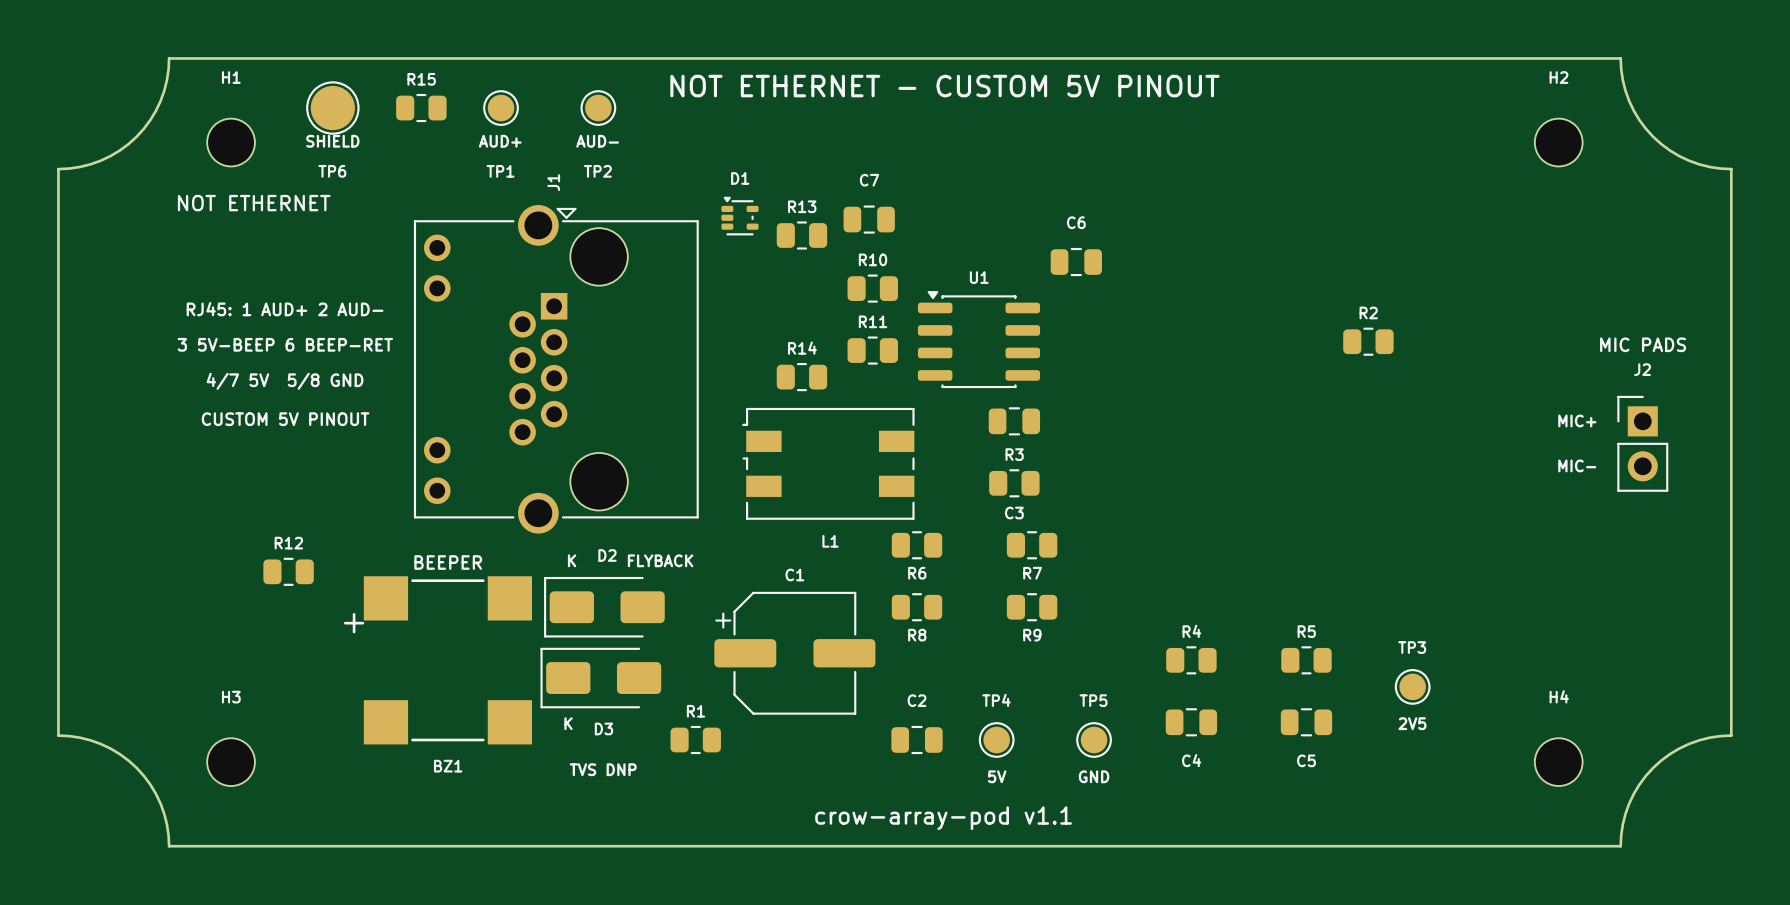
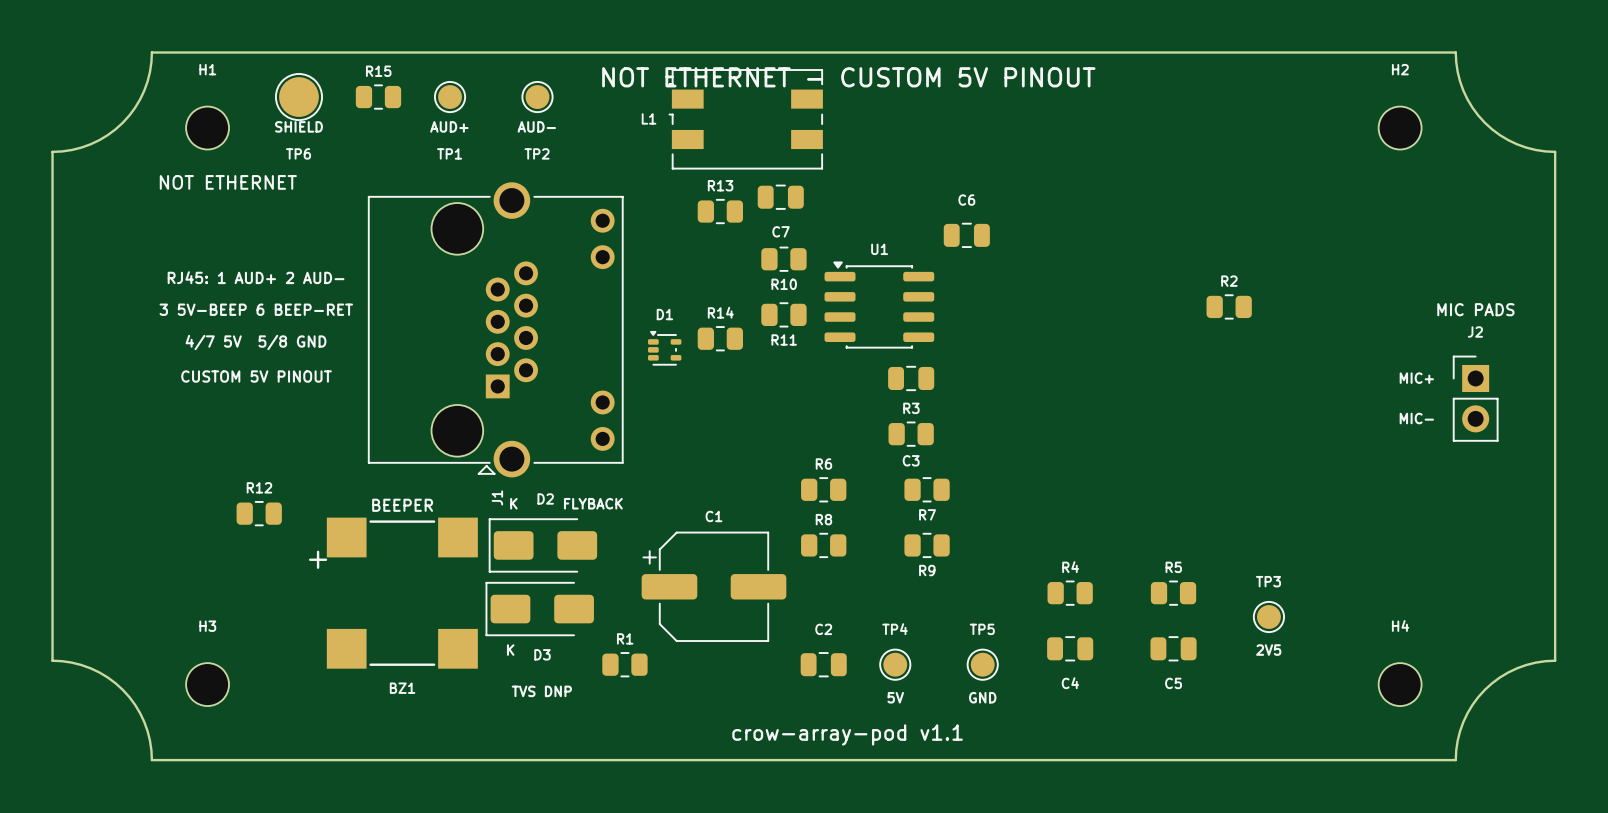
C7 name position: C7 (869, 180) -> C7 (781, 231)
D1 position: (739, 216) -> (664, 348)
R10 name position: R10 (873, 259) -> R10 (784, 284)
R11 name position: R11 (873, 321) -> R11 (784, 339)
J1 rotation: 0° (556, 369) -> 180° (495, 329)
L1 position: (828, 463) -> (745, 119)
L1 name position: L1 (830, 541) -> L1 (649, 118)
R6 name position: R6 (917, 573) -> R6 (823, 463)
R8 name position: R8 (917, 635) -> R8 (823, 519)

